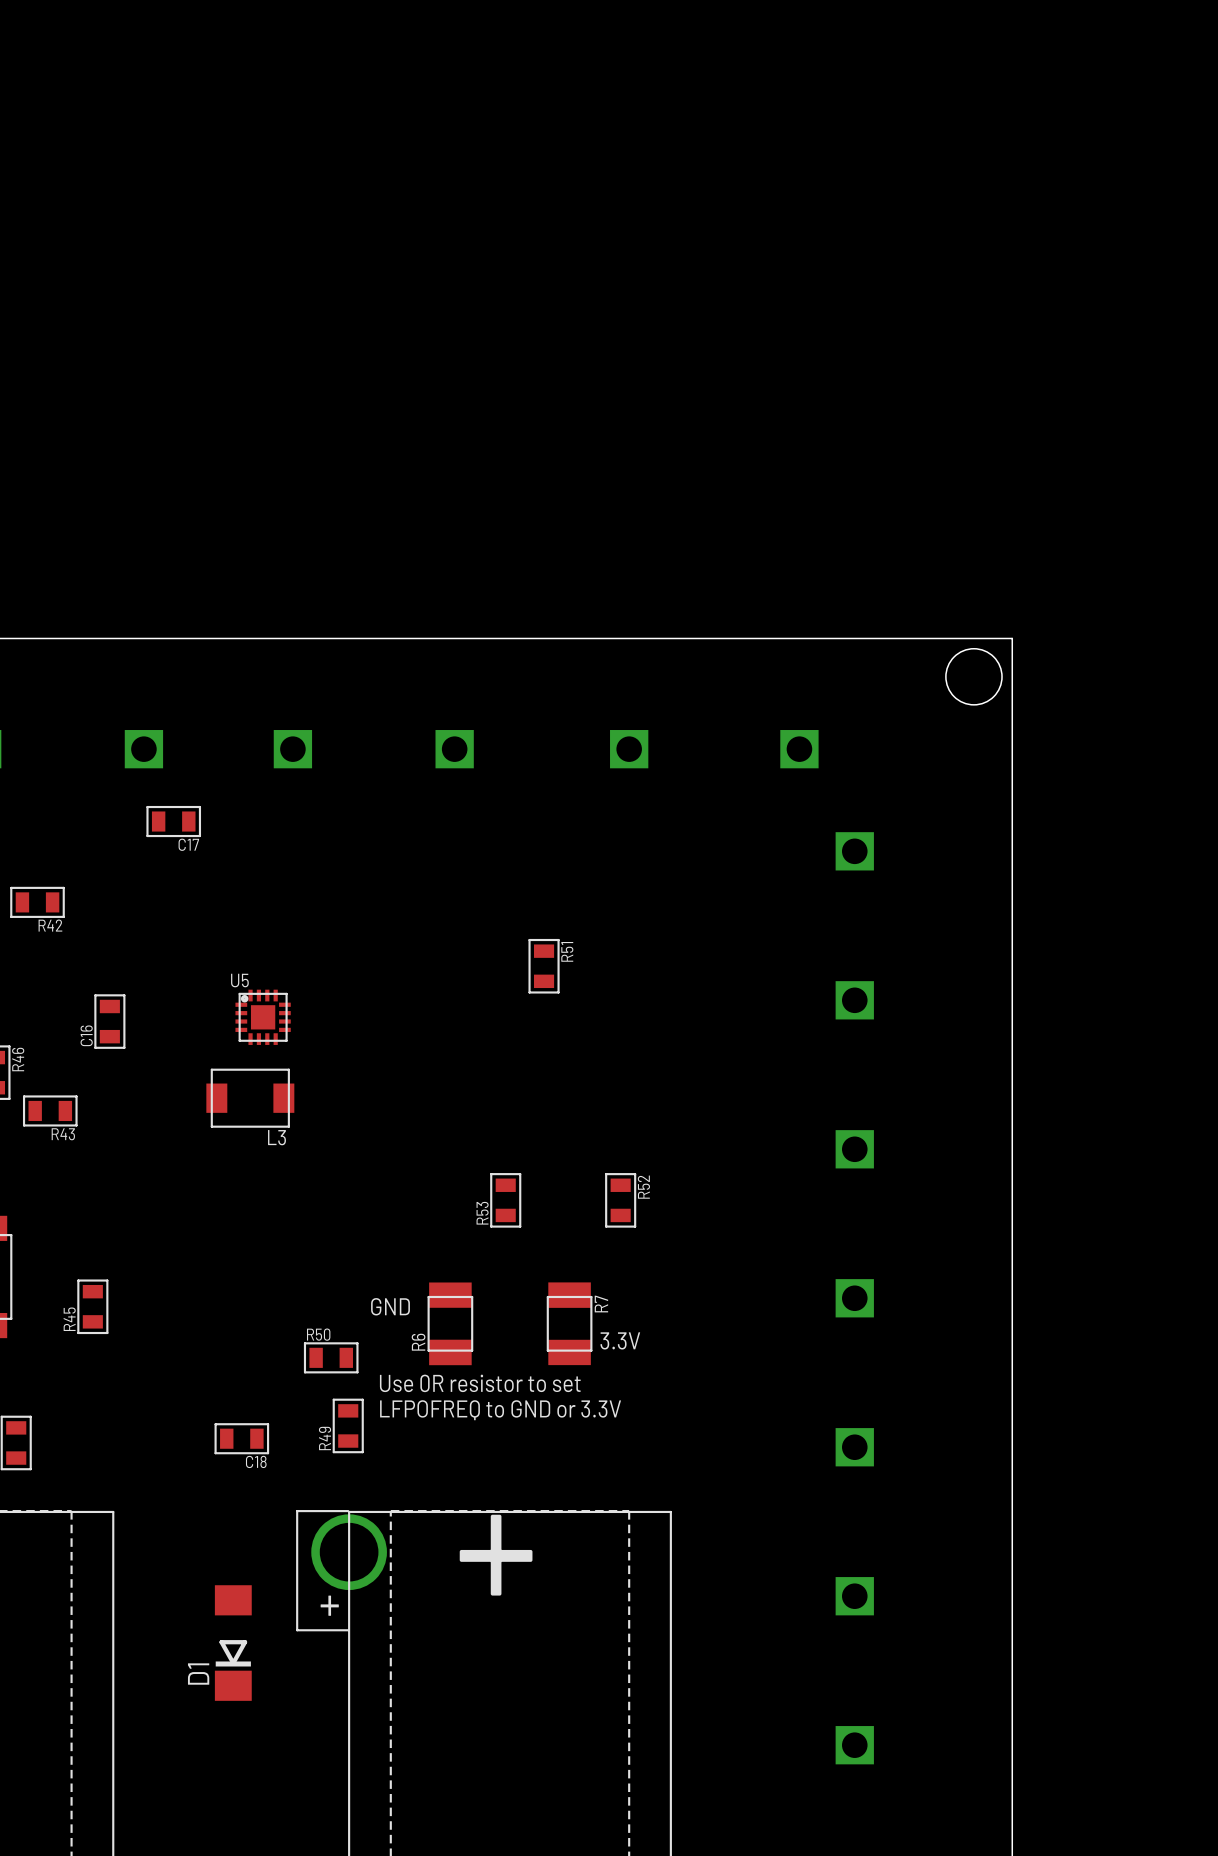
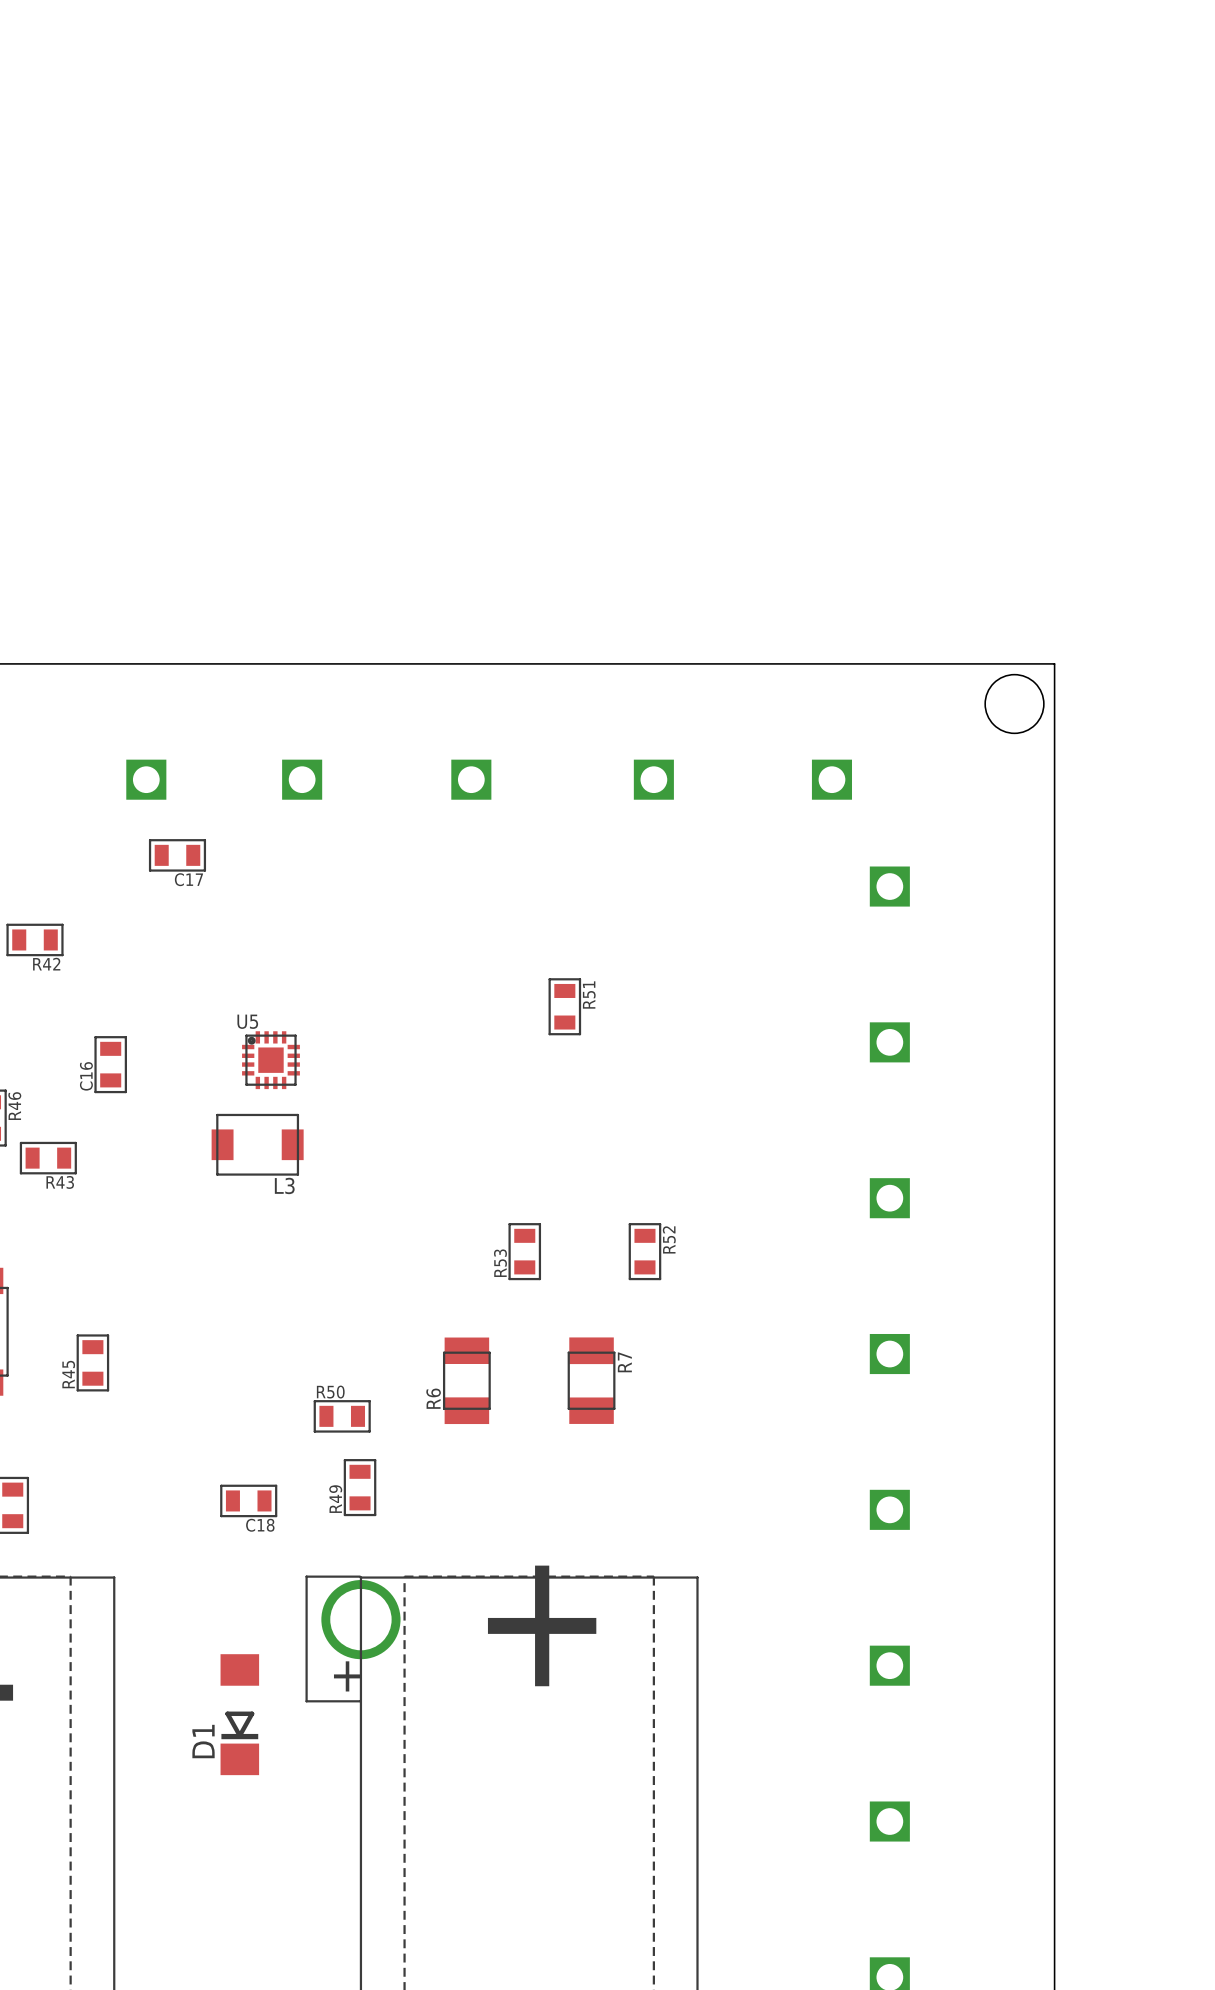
text: GND (390, 1306) -> none
text: 3.3V (620, 1340) -> none
text: Use 0R resistor to set (480, 1383) -> none
text: LFPOFREQ to GND or 3.3V (500, 1410) -> none

